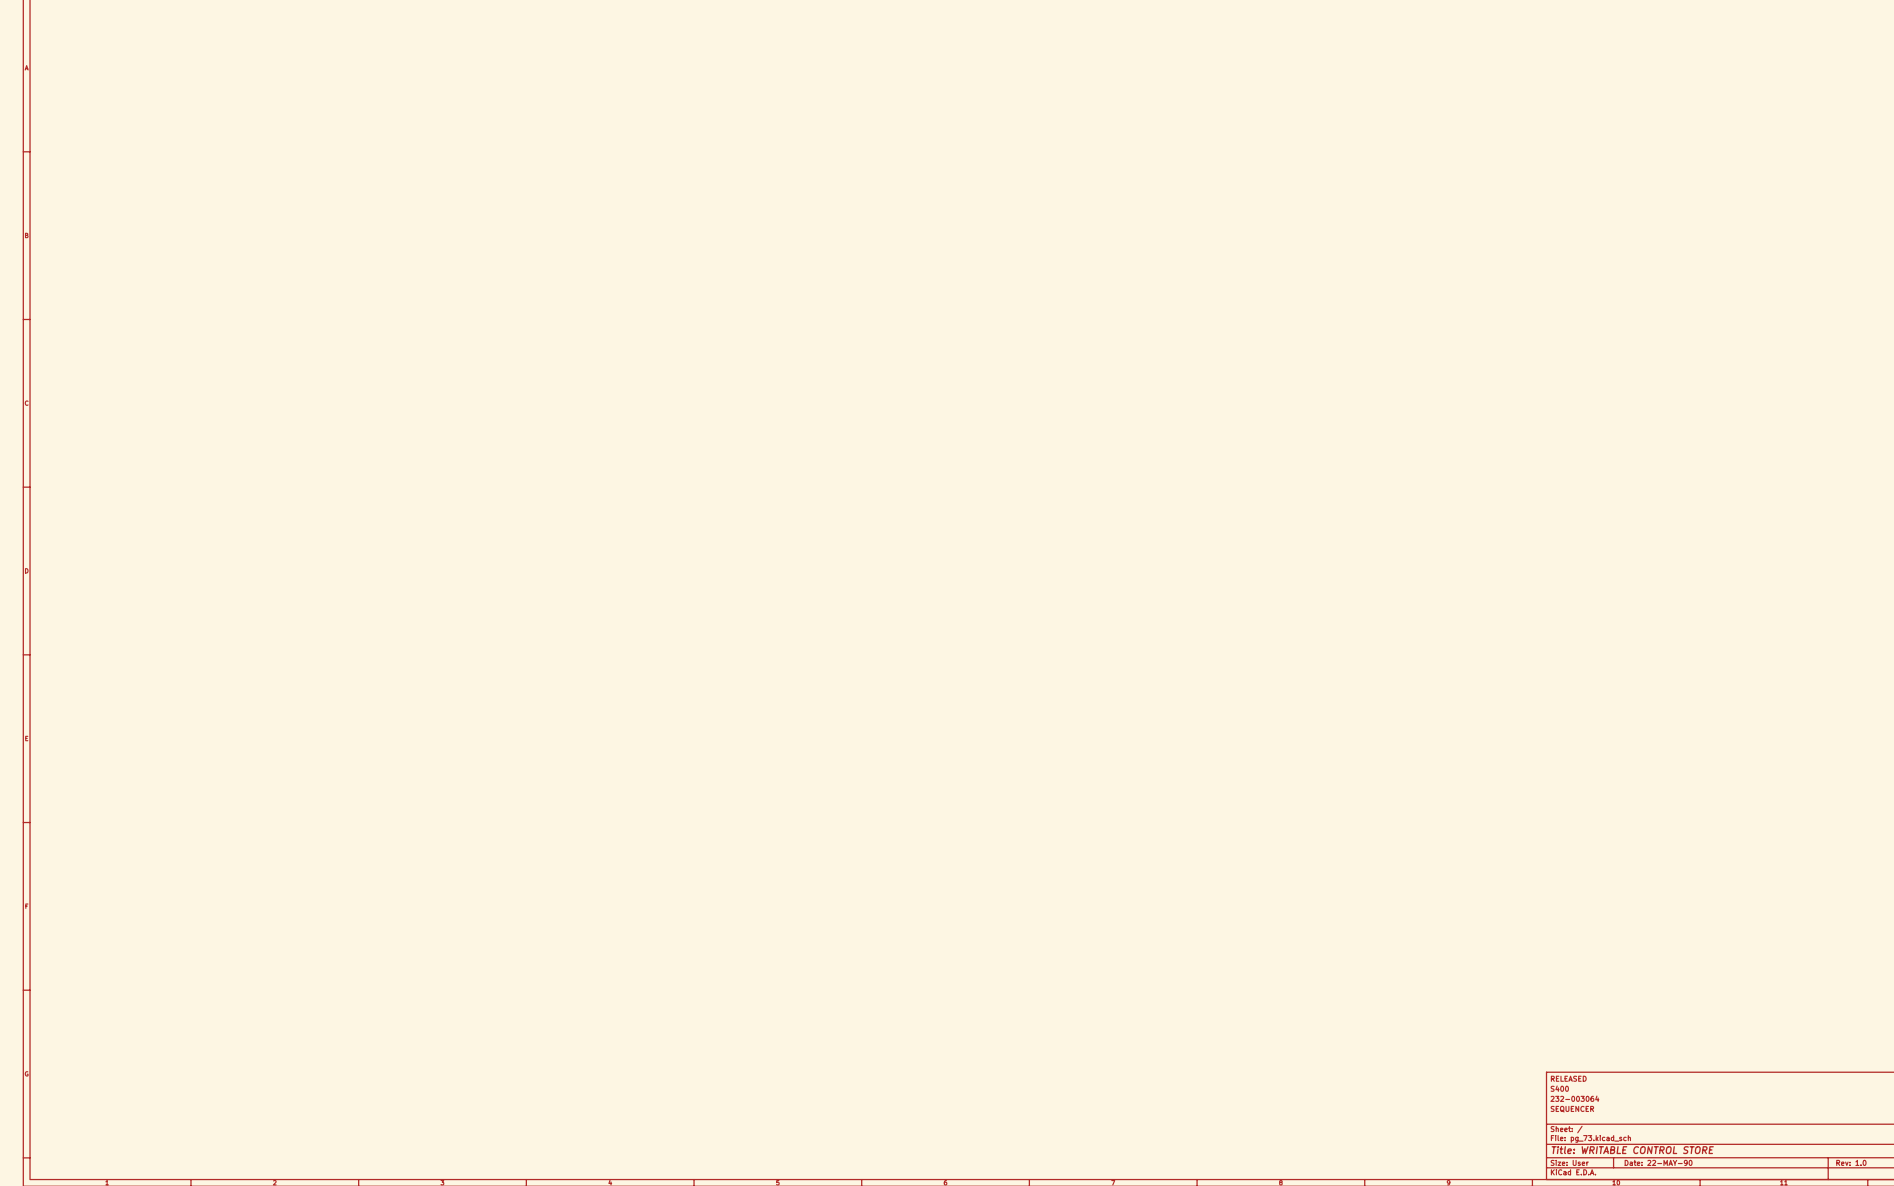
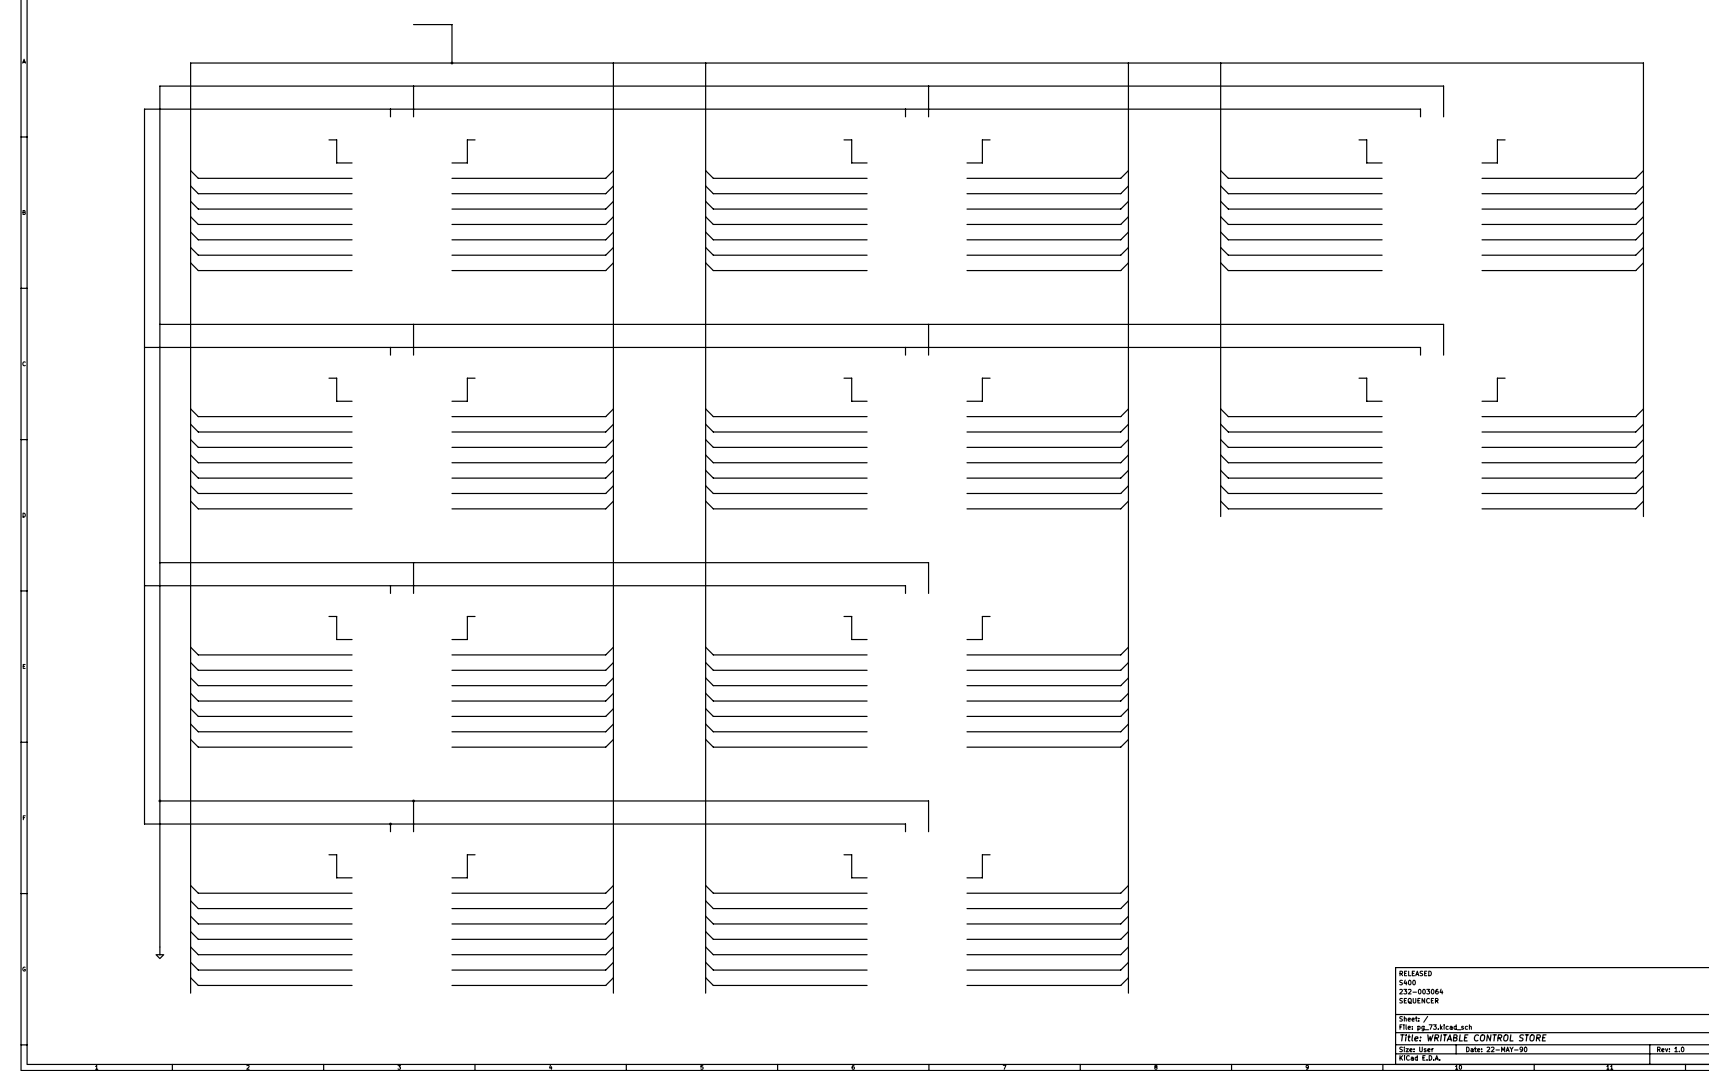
bus: none -> (413, 24) (451, 24) (451, 63)
bus: none -> (613, 63) (613, 993)
bus: none -> (705, 63) (705, 993)
bus: none -> (1128, 63) (1128, 993)
bus: none -> (1220, 63) (1220, 516)
wire: none -> (413, 86) (413, 116)
wire: none -> (928, 86) (928, 116)
wire: none -> (390, 109) (390, 116)
wire: none -> (905, 109) (905, 116)
wire: none -> (1420, 116) (1420, 109) (144, 109) (144, 824) (905, 824) (905, 831)
wire: none -> (1443, 116) (1443, 86) (159, 86) (159, 947)
wire: none -> (328, 139) (336, 139) (336, 162) (352, 162)
wire: none -> (475, 139) (467, 139) (467, 162) (451, 162)
wire: none -> (844, 139) (851, 139) (851, 162) (867, 162)
wire: none -> (990, 139) (982, 139) (982, 162) (967, 162)
wire: none -> (1359, 139) (1366, 139) (1366, 162) (1382, 162)
wire: none -> (1505, 139) (1497, 139) (1497, 162) (1482, 162)
wire: none -> (190, 170) (198, 178) (352, 178)
wire: none -> (613, 170) (605, 178) (451, 178)
wire: none -> (705, 170) (713, 178) (867, 178)
wire: none -> (1128, 170) (1120, 178) (967, 178)
wire: none -> (1220, 170) (1228, 178) (1382, 178)
wire: none -> (1643, 170) (1635, 178) (1482, 178)
wire: none -> (190, 186) (198, 193) (352, 193)
wire: none -> (613, 186) (605, 193) (451, 193)
wire: none -> (705, 186) (713, 193) (867, 193)
wire: none -> (1128, 186) (1120, 193) (967, 193)
wire: none -> (1220, 186) (1228, 193) (1382, 193)
wire: none -> (1643, 186) (1635, 193) (1482, 193)
wire: none -> (190, 201) (198, 209) (352, 209)
wire: none -> (613, 201) (605, 209) (451, 209)
wire: none -> (705, 201) (713, 209) (867, 209)
wire: none -> (1128, 201) (1120, 209) (967, 209)
wire: none -> (1220, 201) (1228, 209) (1382, 209)
wire: none -> (1643, 201) (1635, 209) (1482, 209)
wire: none -> (190, 216) (198, 224) (352, 224)
wire: none -> (613, 216) (605, 224) (451, 224)
wire: none -> (705, 216) (713, 224) (867, 224)
wire: none -> (1128, 216) (1120, 224) (967, 224)
wire: none -> (1220, 216) (1228, 224) (1382, 224)
wire: none -> (1643, 216) (1635, 224) (1482, 224)
wire: none -> (190, 232) (198, 239) (352, 239)
wire: none -> (613, 232) (605, 239) (451, 239)
wire: none -> (705, 232) (713, 239) (867, 239)
wire: none -> (1128, 232) (1120, 239) (967, 239)
wire: none -> (1220, 232) (1228, 239) (1382, 239)
wire: none -> (1643, 232) (1635, 239) (1482, 239)
wire: none -> (190, 247) (198, 255) (352, 255)
wire: none -> (613, 247) (605, 255) (451, 255)
wire: none -> (705, 247) (713, 255) (867, 255)
wire: none -> (1128, 247) (1120, 255) (967, 255)
wire: none -> (1220, 247) (1228, 255) (1382, 255)
wire: none -> (1643, 247) (1635, 255) (1482, 255)
wire: none -> (190, 262) (198, 270) (352, 270)
wire: none -> (613, 262) (605, 270) (451, 270)
wire: none -> (705, 262) (713, 270) (867, 270)
wire: none -> (1128, 262) (1120, 270) (967, 270)
wire: none -> (1220, 262) (1228, 270) (1382, 270)
wire: none -> (1643, 262) (1635, 270) (1482, 270)
wire: none -> (159, 324) (1443, 324) (1443, 355)
wire: none -> (413, 324) (413, 355)
wire: none -> (928, 324) (928, 355)
wire: none -> (144, 347) (1420, 347) (1420, 355)
wire: none -> (390, 347) (390, 355)
wire: none -> (905, 347) (905, 355)
wire: none -> (328, 378) (336, 378) (336, 401) (352, 401)
wire: none -> (475, 378) (467, 378) (467, 401) (451, 401)
wire: none -> (844, 378) (851, 378) (851, 401) (867, 401)
wire: none -> (990, 378) (982, 378) (982, 401) (967, 401)
wire: none -> (1359, 378) (1366, 378) (1366, 401) (1382, 401)
wire: none -> (1505, 378) (1497, 378) (1497, 401) (1482, 401)
wire: none -> (190, 408) (198, 416) (352, 416)
wire: none -> (613, 408) (605, 416) (451, 416)
wire: none -> (705, 408) (713, 416) (867, 416)
wire: none -> (1128, 408) (1120, 416) (967, 416)
wire: none -> (1220, 408) (1228, 416) (1382, 416)
wire: none -> (1643, 408) (1635, 416) (1482, 416)
wire: none -> (190, 424) (198, 431) (352, 431)
wire: none -> (613, 424) (605, 431) (451, 431)
wire: none -> (705, 424) (713, 431) (867, 431)
wire: none -> (1128, 424) (1120, 431) (967, 431)
wire: none -> (1220, 424) (1228, 431) (1382, 431)
wire: none -> (1643, 424) (1635, 431) (1482, 431)
wire: none -> (190, 439) (198, 447) (352, 447)
wire: none -> (613, 439) (605, 447) (451, 447)
wire: none -> (705, 439) (713, 447) (867, 447)
wire: none -> (1128, 439) (1120, 447) (967, 447)
wire: none -> (1220, 439) (1228, 447) (1382, 447)
wire: none -> (1643, 439) (1635, 447) (1482, 447)
wire: none -> (190, 455) (198, 462) (352, 462)
wire: none -> (613, 455) (605, 462) (451, 462)
wire: none -> (705, 455) (713, 462) (867, 462)
wire: none -> (1128, 455) (1120, 462) (967, 462)
wire: none -> (1220, 455) (1228, 462) (1382, 462)
wire: none -> (1643, 455) (1635, 462) (1482, 462)
wire: none -> (190, 470) (198, 478) (352, 478)
wire: none -> (613, 470) (605, 478) (451, 478)
wire: none -> (705, 470) (713, 478) (867, 478)
wire: none -> (1128, 470) (1120, 478) (967, 478)
wire: none -> (1220, 470) (1228, 478) (1382, 478)
wire: none -> (1643, 470) (1635, 478) (1482, 478)
wire: none -> (190, 485) (198, 493) (352, 493)
wire: none -> (613, 485) (605, 493) (451, 493)
wire: none -> (705, 485) (713, 493) (867, 493)
wire: none -> (1128, 485) (1120, 493) (967, 493)
wire: none -> (1220, 485) (1228, 493) (1382, 493)
wire: none -> (1643, 485) (1635, 493) (1482, 493)
wire: none -> (190, 501) (198, 508) (352, 508)
wire: none -> (613, 501) (605, 508) (451, 508)
wire: none -> (705, 501) (713, 508) (867, 508)
wire: none -> (1128, 501) (1120, 508) (967, 508)
wire: none -> (1220, 501) (1228, 508) (1382, 508)
wire: none -> (1643, 501) (1635, 508) (1482, 508)
bus: none -> (1643, 516) (1643, 63) (190, 63) (190, 993)
wire: none -> (159, 562) (928, 562) (928, 593)
wire: none -> (413, 562) (413, 593)
wire: none -> (144, 585) (905, 585) (905, 593)
wire: none -> (390, 585) (390, 593)
wire: none -> (328, 616) (336, 616) (336, 639) (352, 639)
wire: none -> (475, 616) (467, 616) (467, 639) (451, 639)
wire: none -> (844, 616) (851, 616) (851, 639) (867, 639)
wire: none -> (990, 616) (982, 616) (982, 639) (967, 639)
wire: none -> (190, 647) (198, 654) (352, 654)
wire: none -> (613, 647) (605, 654) (451, 654)
wire: none -> (705, 647) (713, 654) (867, 654)
wire: none -> (1128, 647) (1120, 654) (967, 654)
wire: none -> (190, 662) (198, 670) (352, 670)
wire: none -> (613, 662) (605, 670) (451, 670)
wire: none -> (705, 662) (713, 670) (867, 670)
wire: none -> (1128, 662) (1120, 670) (967, 670)
wire: none -> (190, 677) (198, 685) (352, 685)
wire: none -> (613, 677) (605, 685) (451, 685)
wire: none -> (705, 677) (713, 685) (867, 685)
wire: none -> (1128, 677) (1120, 685) (967, 685)
wire: none -> (190, 693) (198, 701) (352, 701)
wire: none -> (613, 693) (605, 701) (451, 701)
wire: none -> (705, 693) (713, 701) (867, 701)
wire: none -> (1128, 693) (1120, 701) (967, 701)
wire: none -> (190, 708) (198, 716) (352, 716)
wire: none -> (613, 708) (605, 716) (451, 716)
wire: none -> (705, 708) (713, 716) (867, 716)
wire: none -> (1128, 708) (1120, 716) (967, 716)
wire: none -> (190, 724) (198, 731) (352, 731)
wire: none -> (613, 724) (605, 731) (451, 731)
wire: none -> (705, 724) (713, 731) (867, 731)
wire: none -> (1128, 724) (1120, 731) (967, 731)
wire: none -> (190, 739) (198, 747) (352, 747)
wire: none -> (613, 739) (605, 747) (451, 747)
wire: none -> (705, 739) (713, 747) (867, 747)
wire: none -> (1128, 739) (1120, 747) (967, 747)
wire: none -> (159, 800) (928, 800) (928, 831)
wire: none -> (413, 800) (413, 831)
junction: none -> (413, 800)
wire: none -> (390, 824) (390, 831)
junction: none -> (390, 824)
wire: none -> (328, 854) (336, 854) (336, 877) (352, 877)
wire: none -> (475, 854) (467, 854) (467, 877) (451, 877)
wire: none -> (844, 854) (851, 854) (851, 877) (867, 877)
wire: none -> (990, 854) (982, 854) (982, 877) (967, 877)
wire: none -> (190, 885) (198, 893) (352, 893)
wire: none -> (613, 885) (605, 893) (451, 893)
wire: none -> (705, 885) (713, 893) (867, 893)
wire: none -> (1128, 885) (1120, 893) (967, 893)
wire: none -> (190, 900) (198, 908) (352, 908)
wire: none -> (613, 900) (605, 908) (451, 908)
wire: none -> (705, 900) (713, 908) (867, 908)
wire: none -> (1128, 900) (1120, 908) (967, 908)
wire: none -> (190, 916) (198, 923) (352, 923)
wire: none -> (613, 916) (605, 923) (451, 923)
wire: none -> (705, 916) (713, 923) (867, 923)
wire: none -> (1128, 916) (1120, 923) (967, 923)
wire: none -> (190, 931) (198, 939) (352, 939)
wire: none -> (613, 931) (605, 939) (451, 939)
wire: none -> (705, 931) (713, 939) (867, 939)
wire: none -> (1128, 931) (1120, 939) (967, 939)
wire: none -> (190, 947) (198, 954) (352, 954)
wire: none -> (613, 947) (605, 954) (451, 954)
wire: none -> (705, 947) (713, 954) (867, 954)
wire: none -> (1128, 947) (1120, 954) (967, 954)
power symbol: none -> (159, 952)
wire: none -> (190, 962) (198, 970) (352, 970)
wire: none -> (613, 962) (605, 970) (451, 970)
wire: none -> (705, 962) (713, 970) (867, 970)
wire: none -> (1128, 962) (1120, 970) (967, 970)
wire: none -> (190, 977) (198, 985) (352, 985)
wire: none -> (613, 977) (605, 985) (451, 985)
wire: none -> (705, 977) (713, 985) (867, 985)
wire: none -> (1128, 977) (1120, 985) (967, 985)

